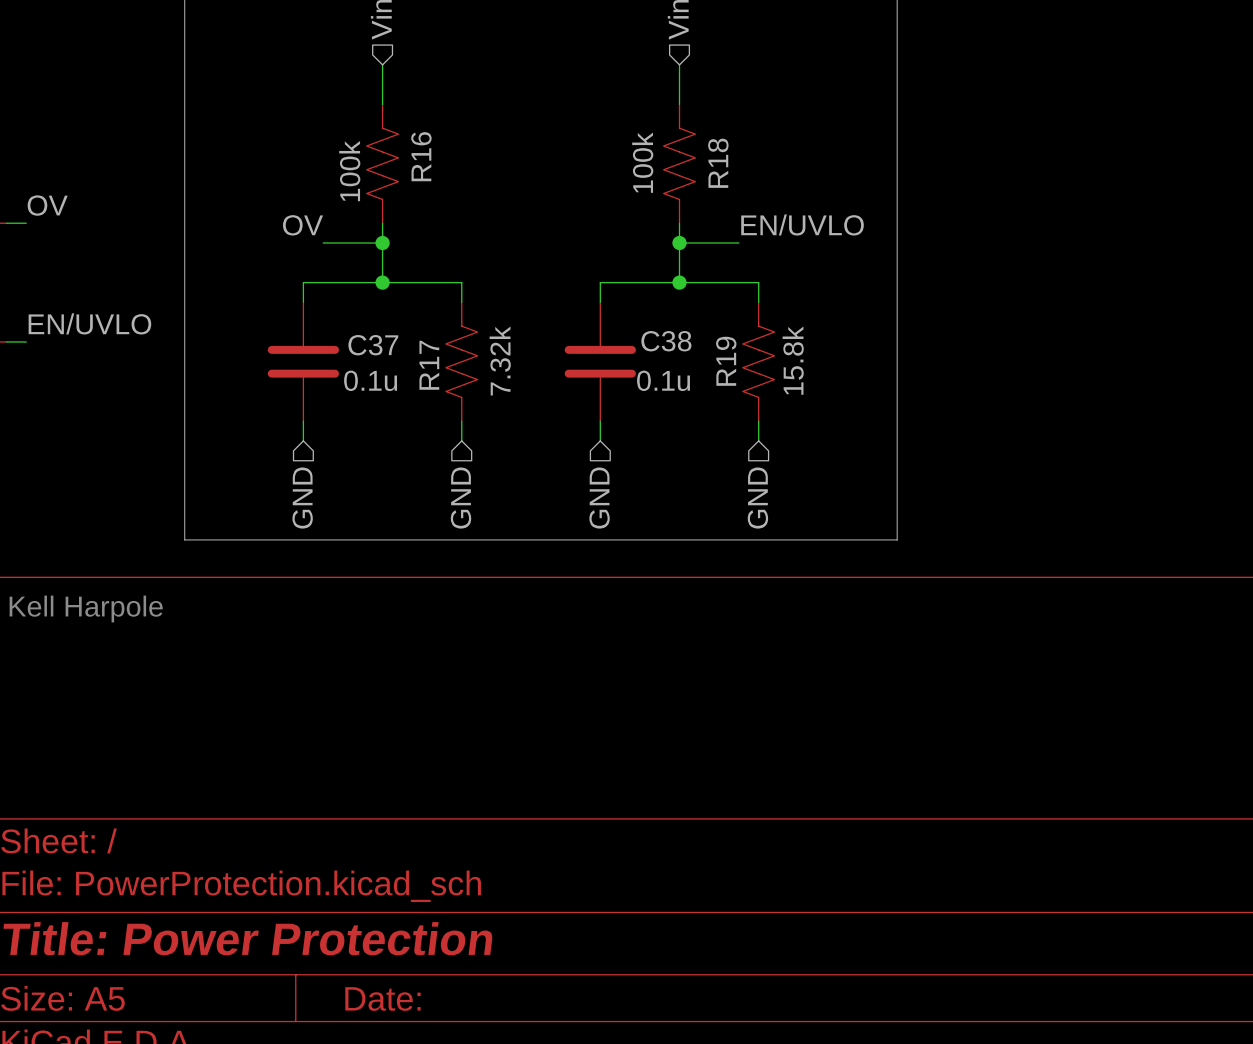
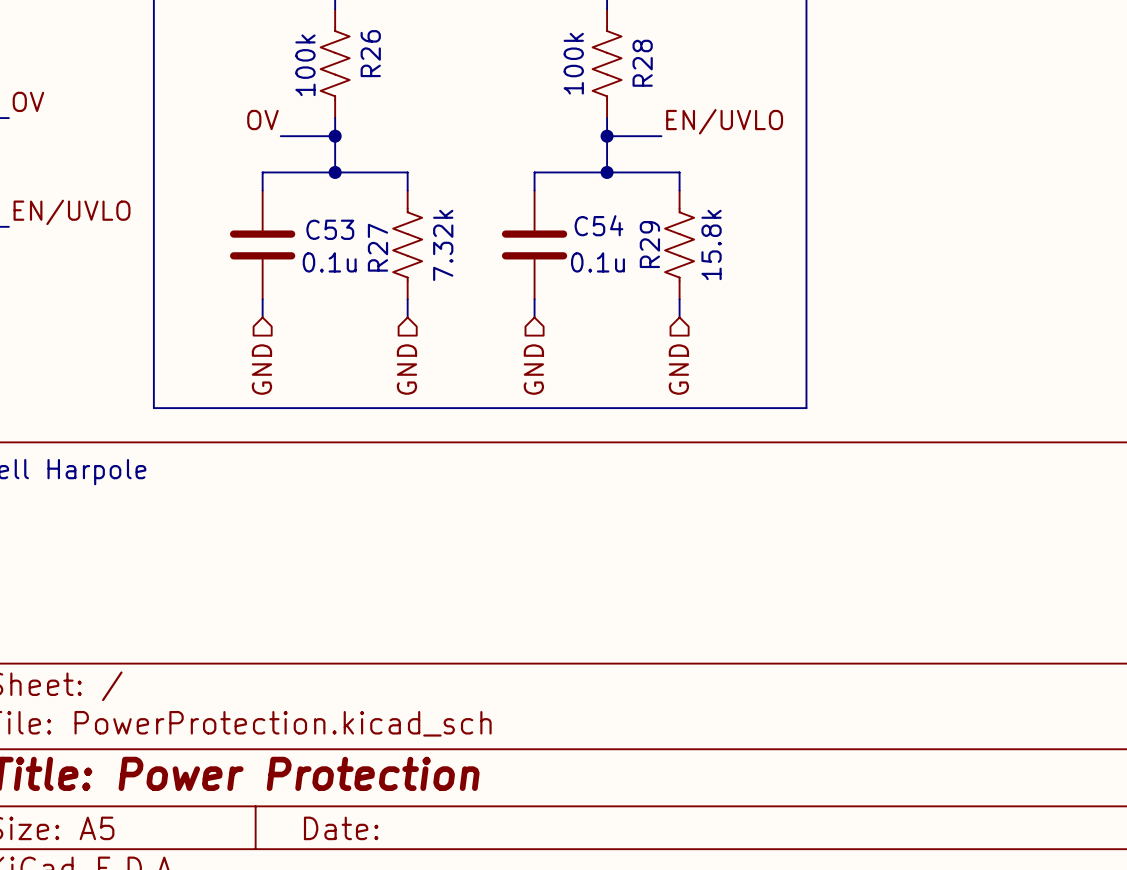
R16 name: R16 (421, 156) -> R26 (370, 53)
R18 name: R18 (718, 163) -> R28 (642, 63)
C38 name: C38 (666, 341) -> C54 (599, 225)
C37 name: C37 (373, 345) -> C53 (330, 229)
R19 name: R19 (726, 361) -> R29 (649, 244)
R17 name: R17 (429, 365) -> R27 (377, 247)

